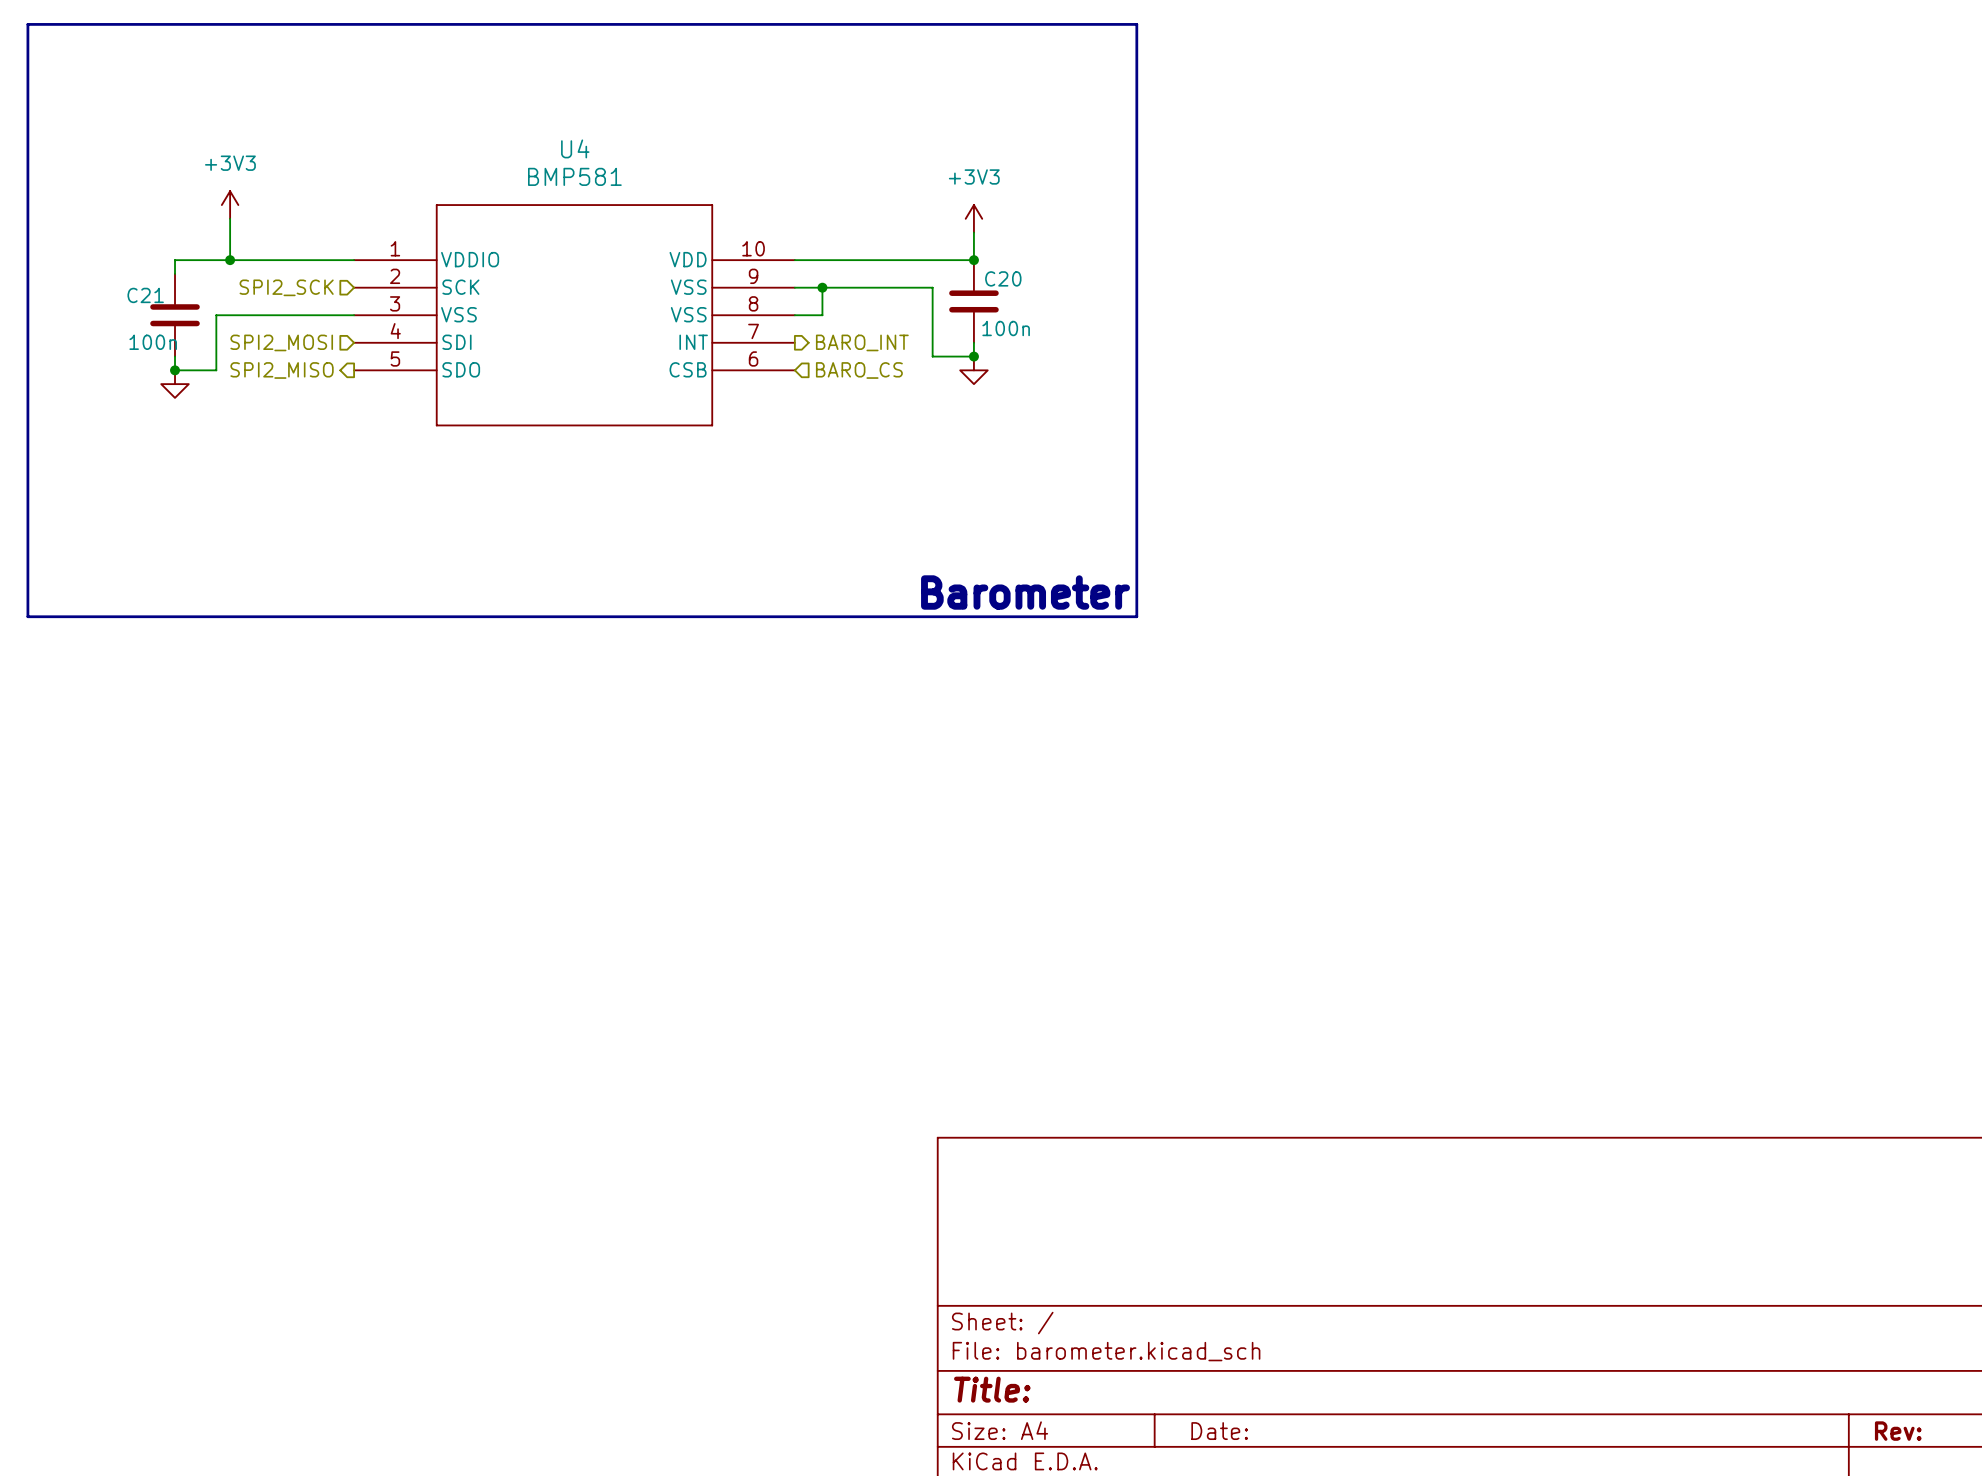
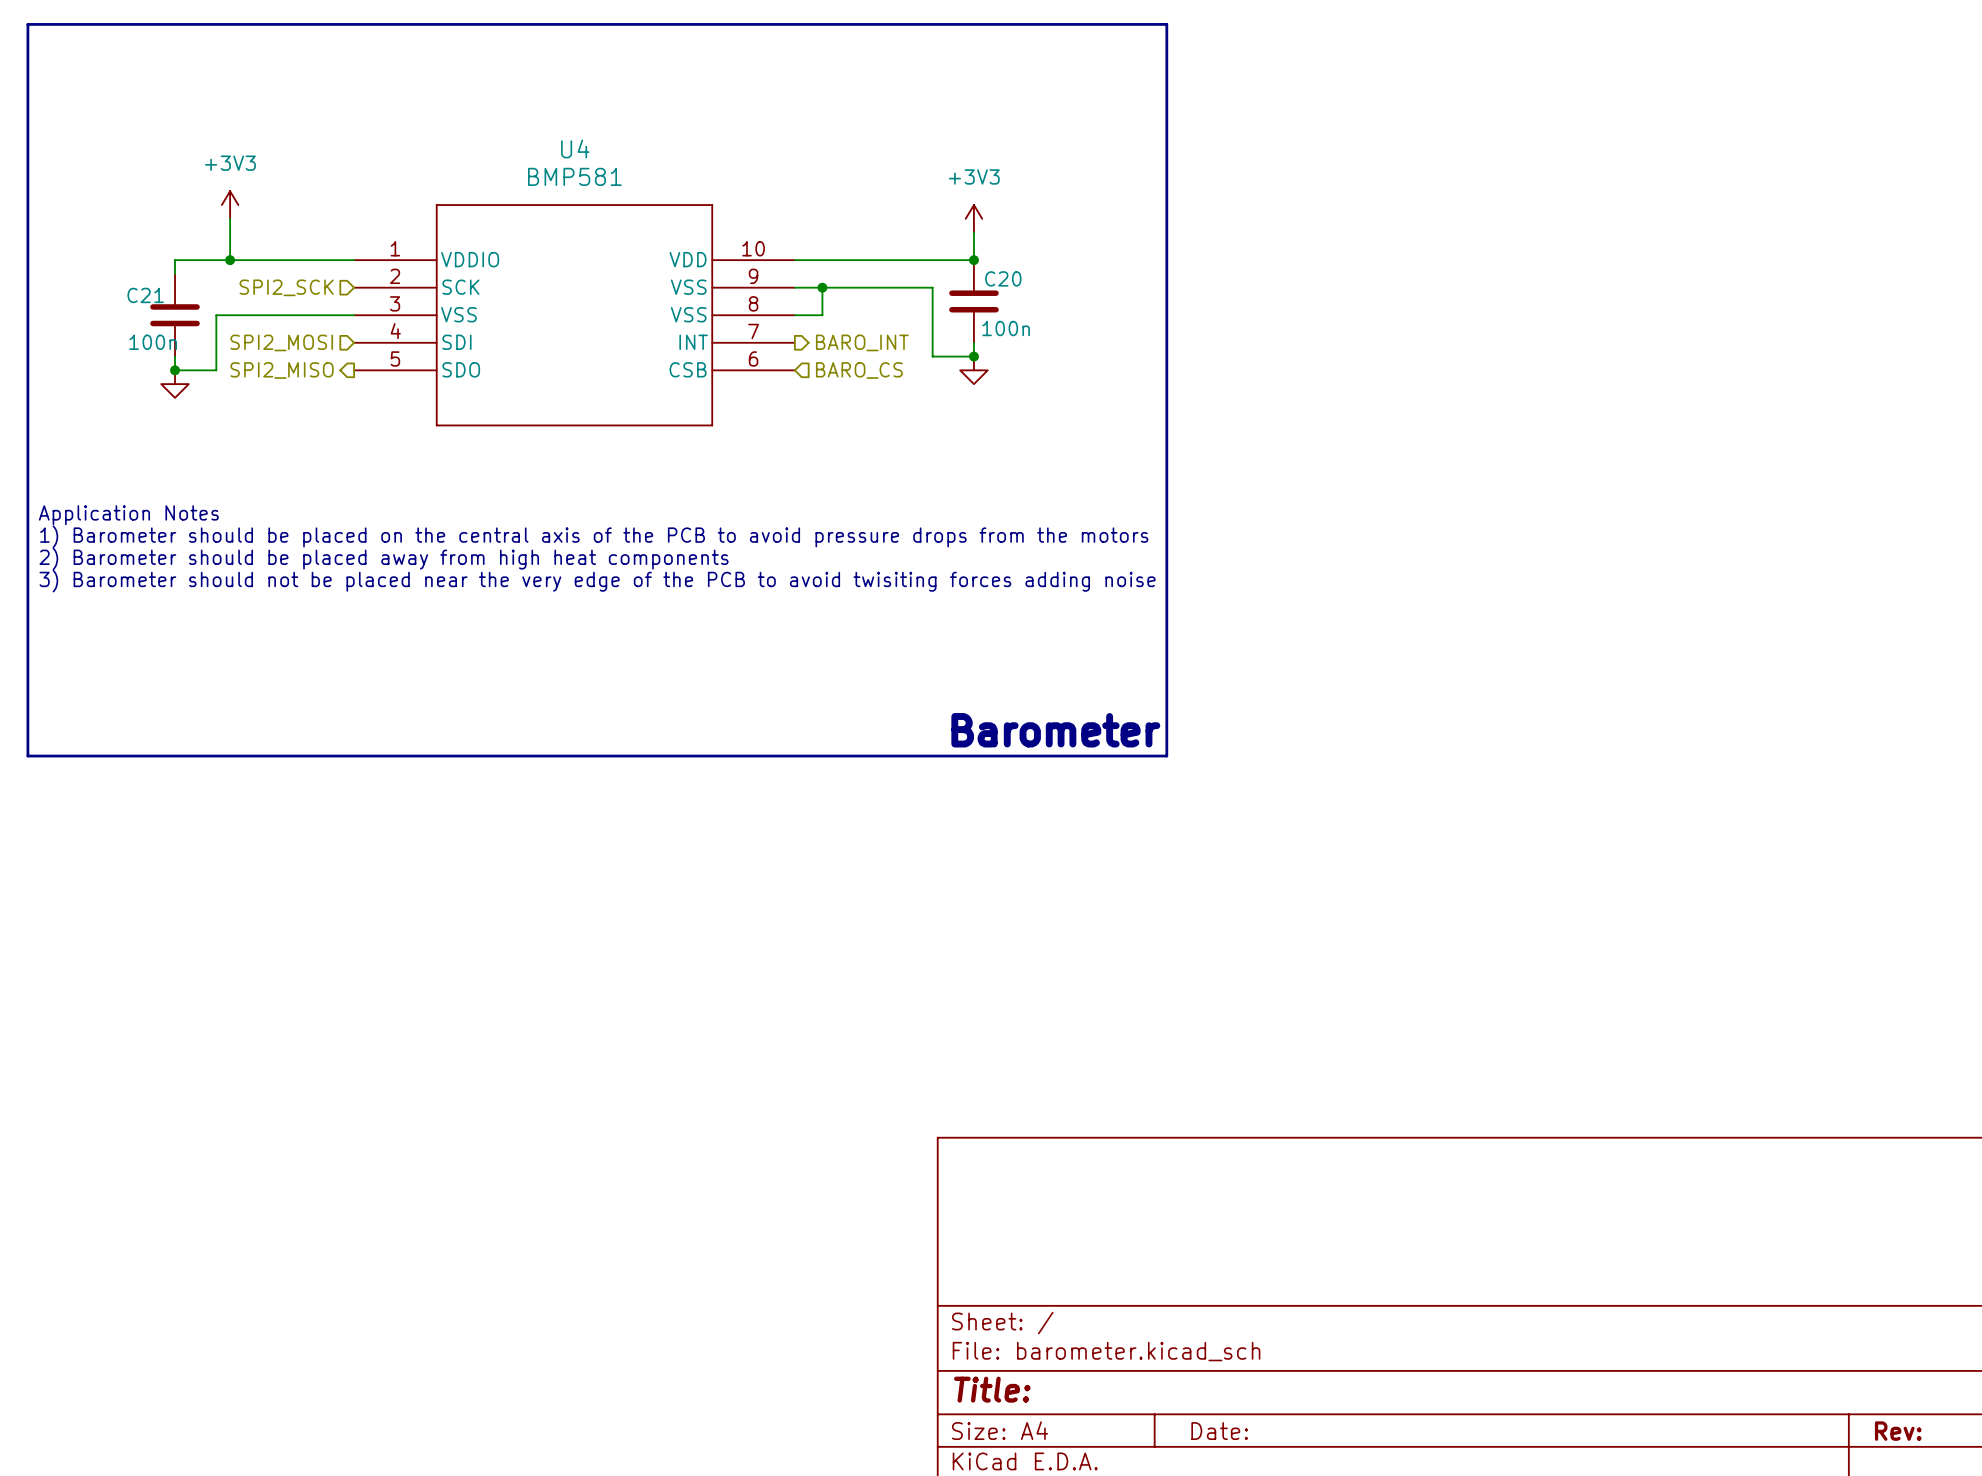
line: (1136, 24) (1136, 616) (27, 616) -> (1136, 24) (1166, 24) (1166, 756) (27, 756) (27, 616)
text: none -> Application Notes (128, 515)
text: none -> 1) Barometer should be placed on the central axis of the PCB to avoid pressure drops from the motors (594, 536)
text: none -> 2) Barometer should be placed away from high heat components (384, 558)
text: none -> 3) Barometer should not be placed near the very edge of the PCB to avoid twisiting forces adding noise (597, 581)
text position: Barometer (1025, 592) -> Barometer (1055, 730)

